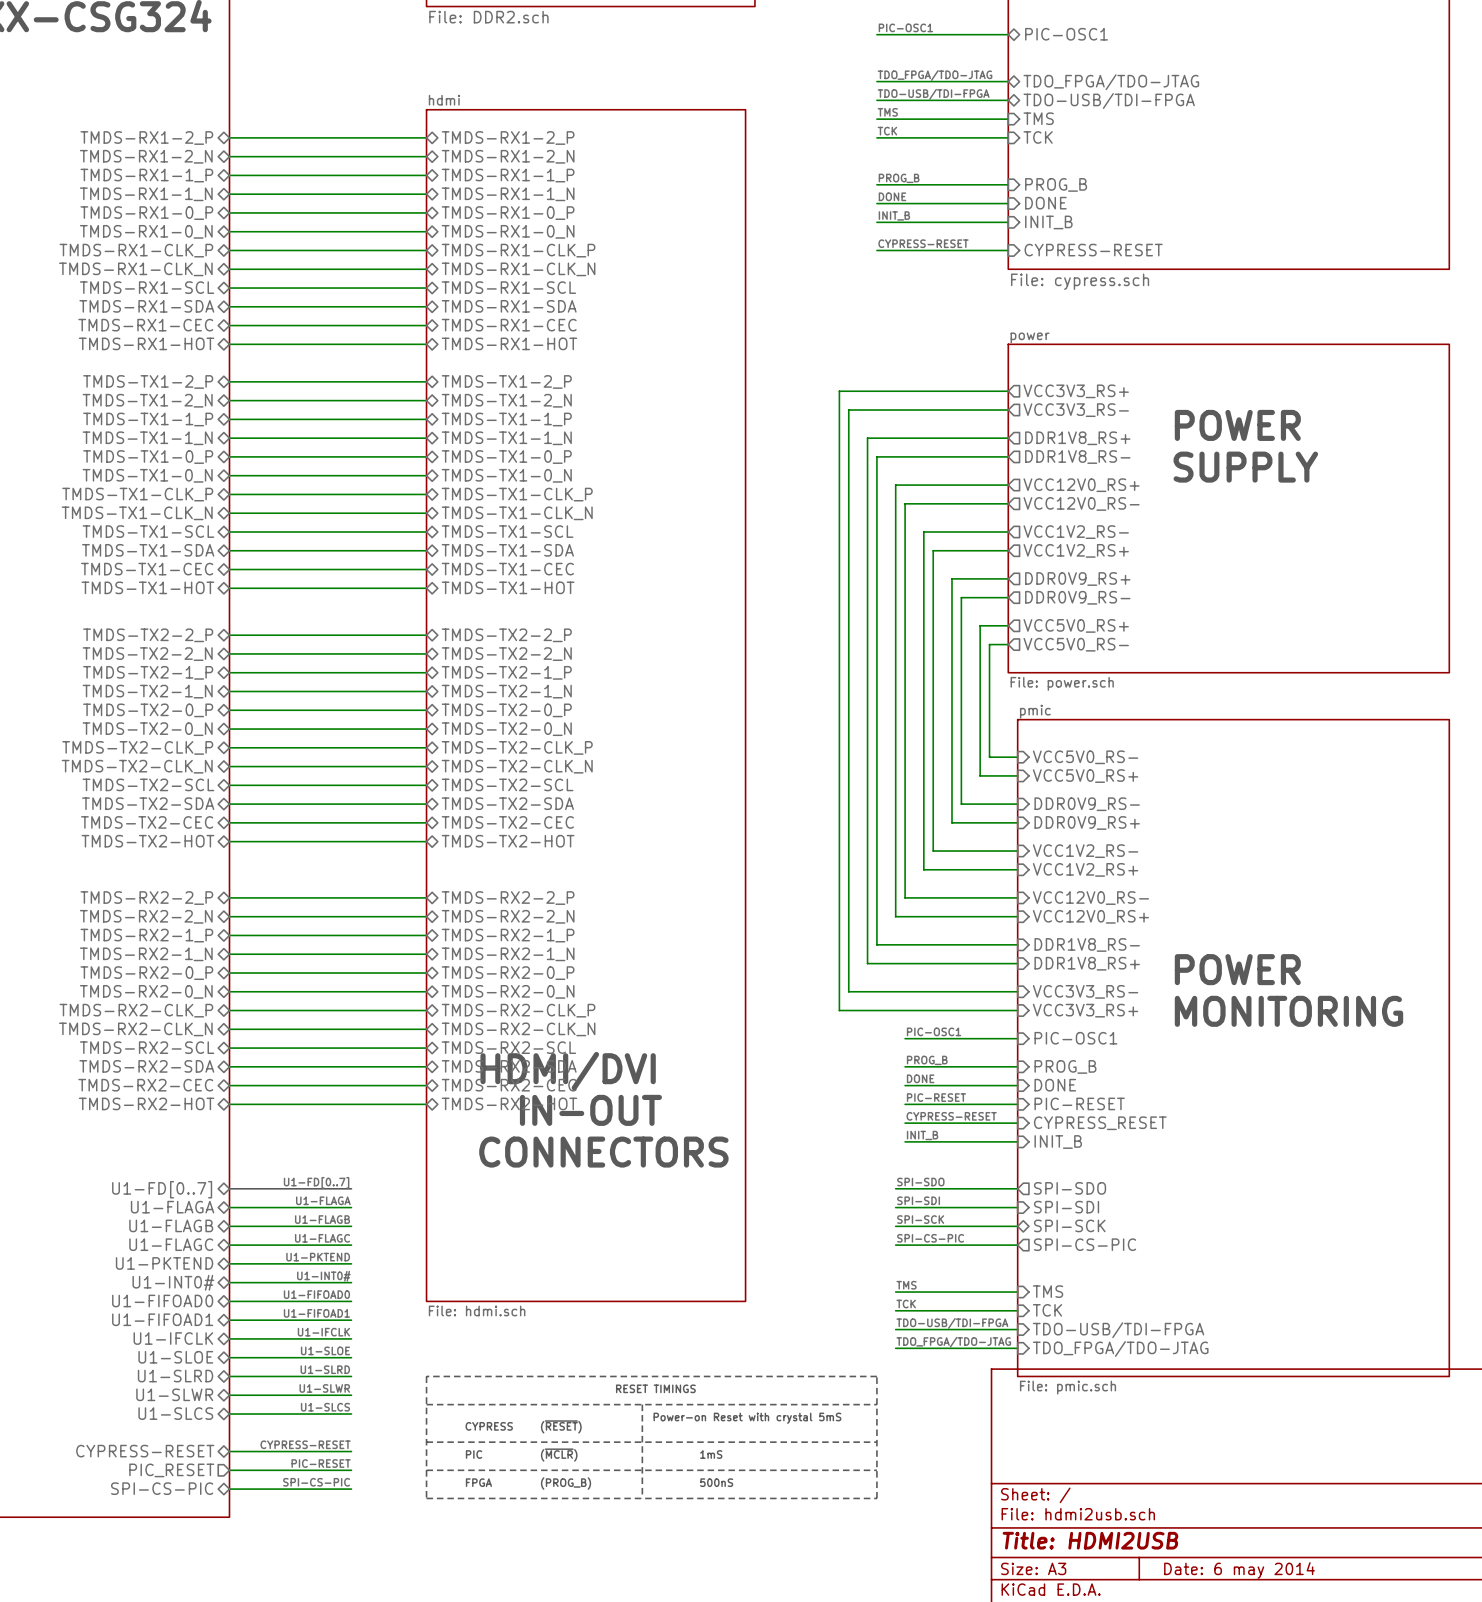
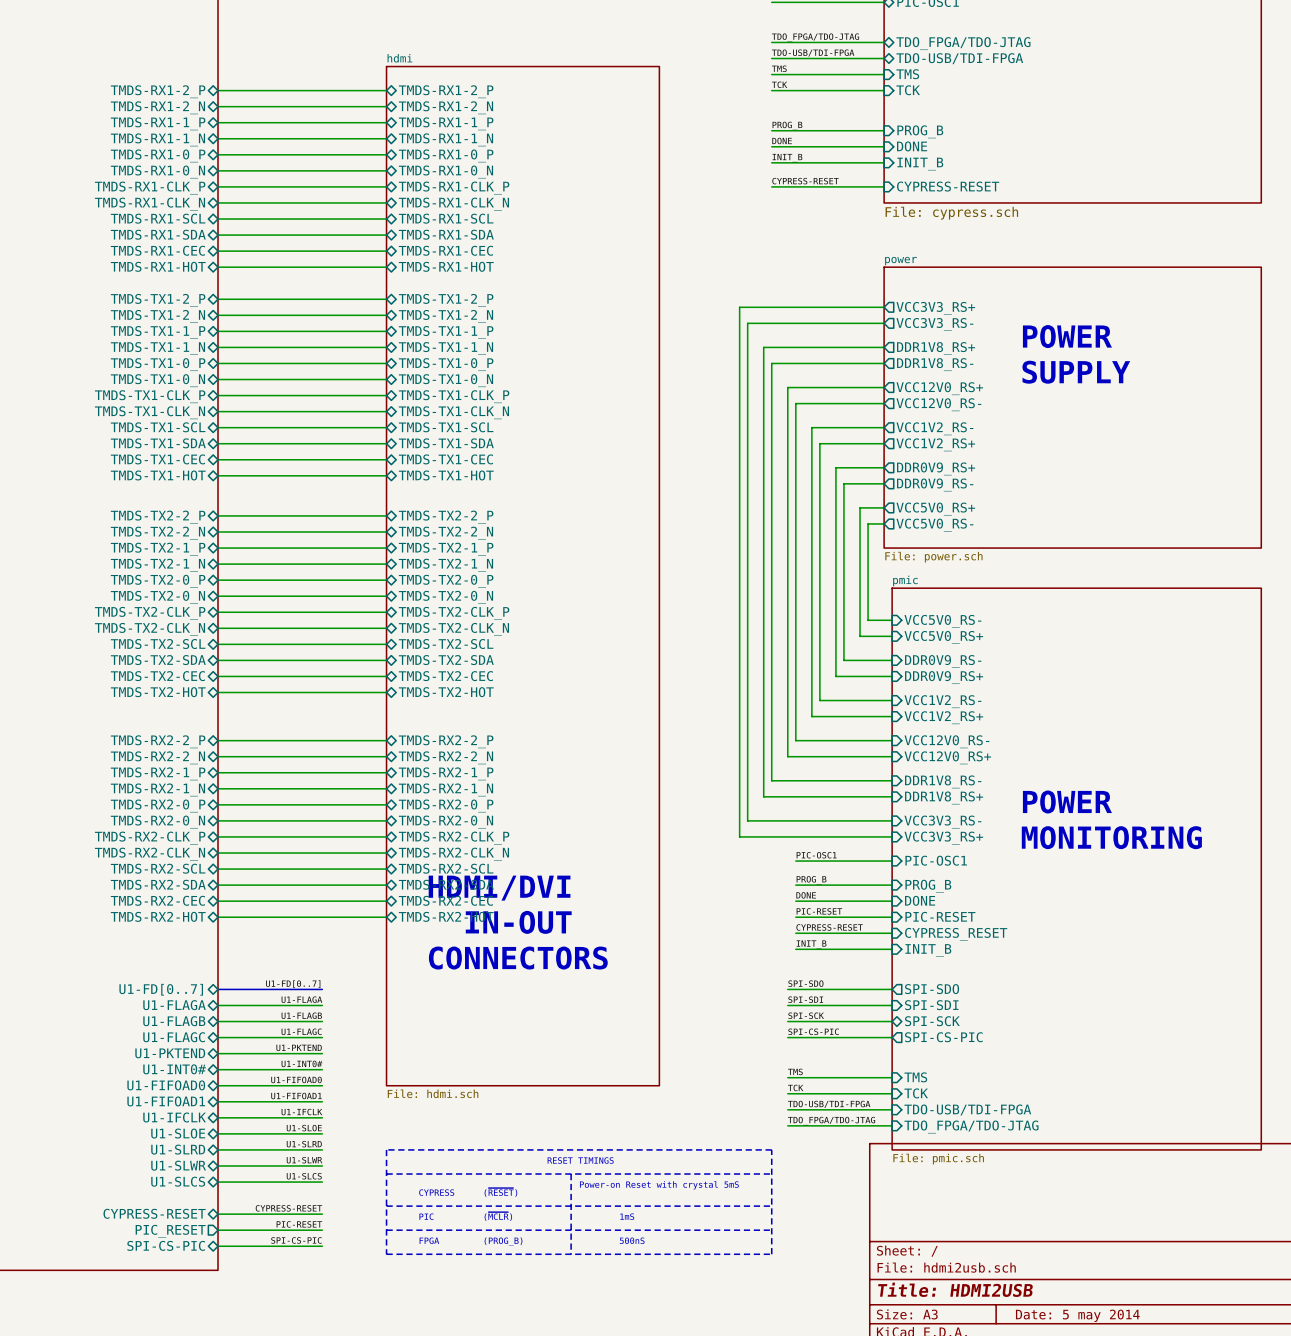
title block: Date: 6 may 2014 (1239, 1570) -> Date: 5 may 2014 (1077, 1315)

